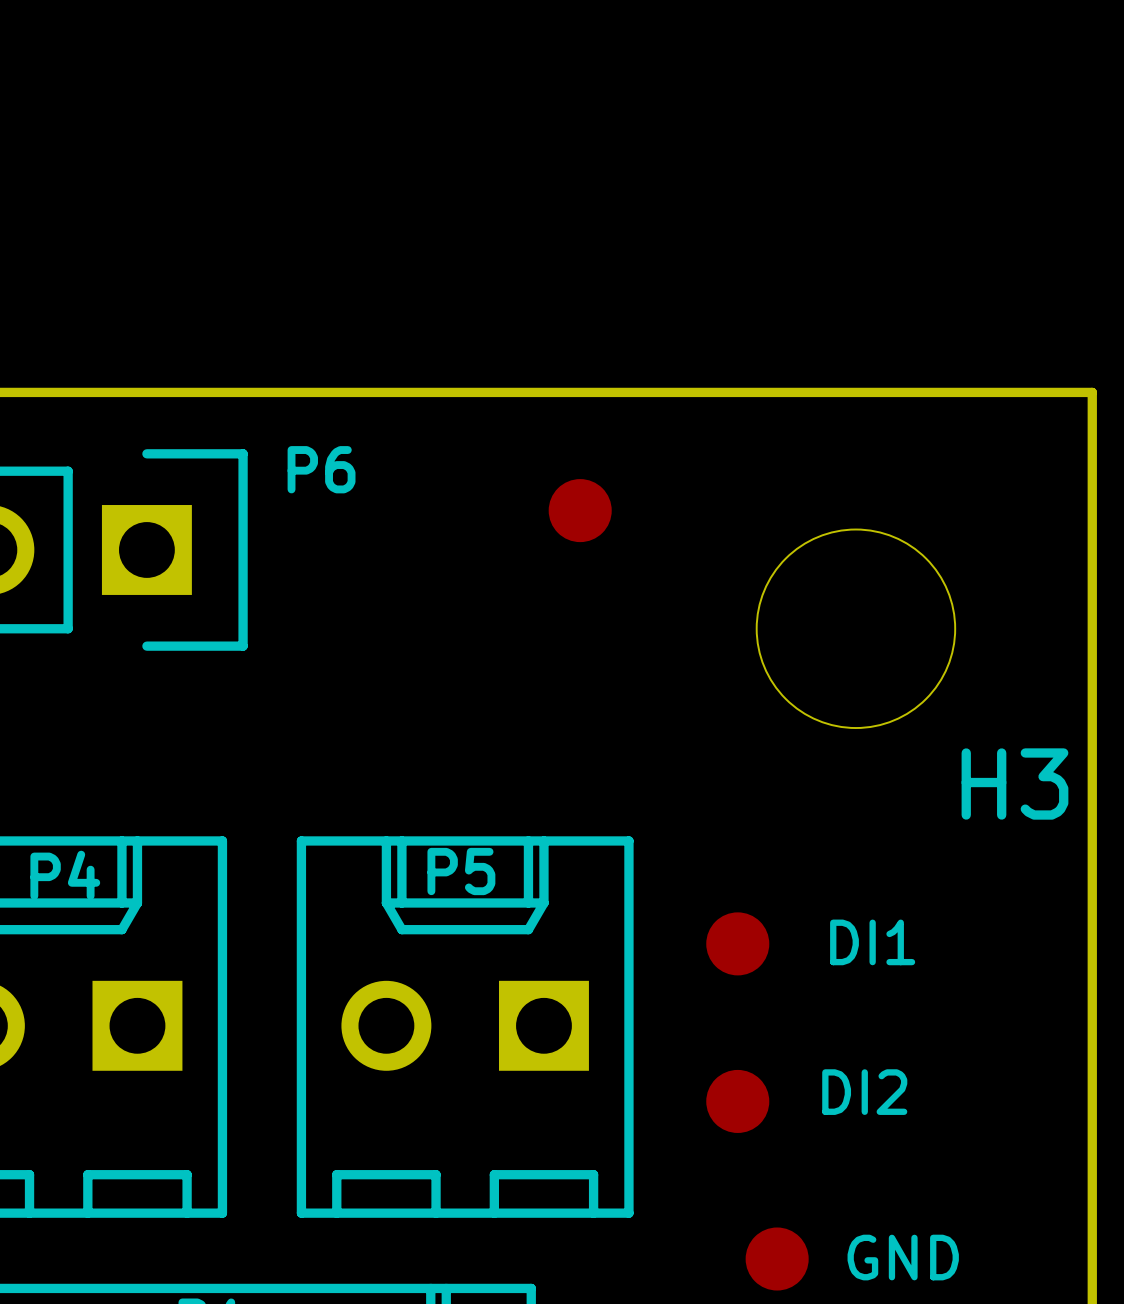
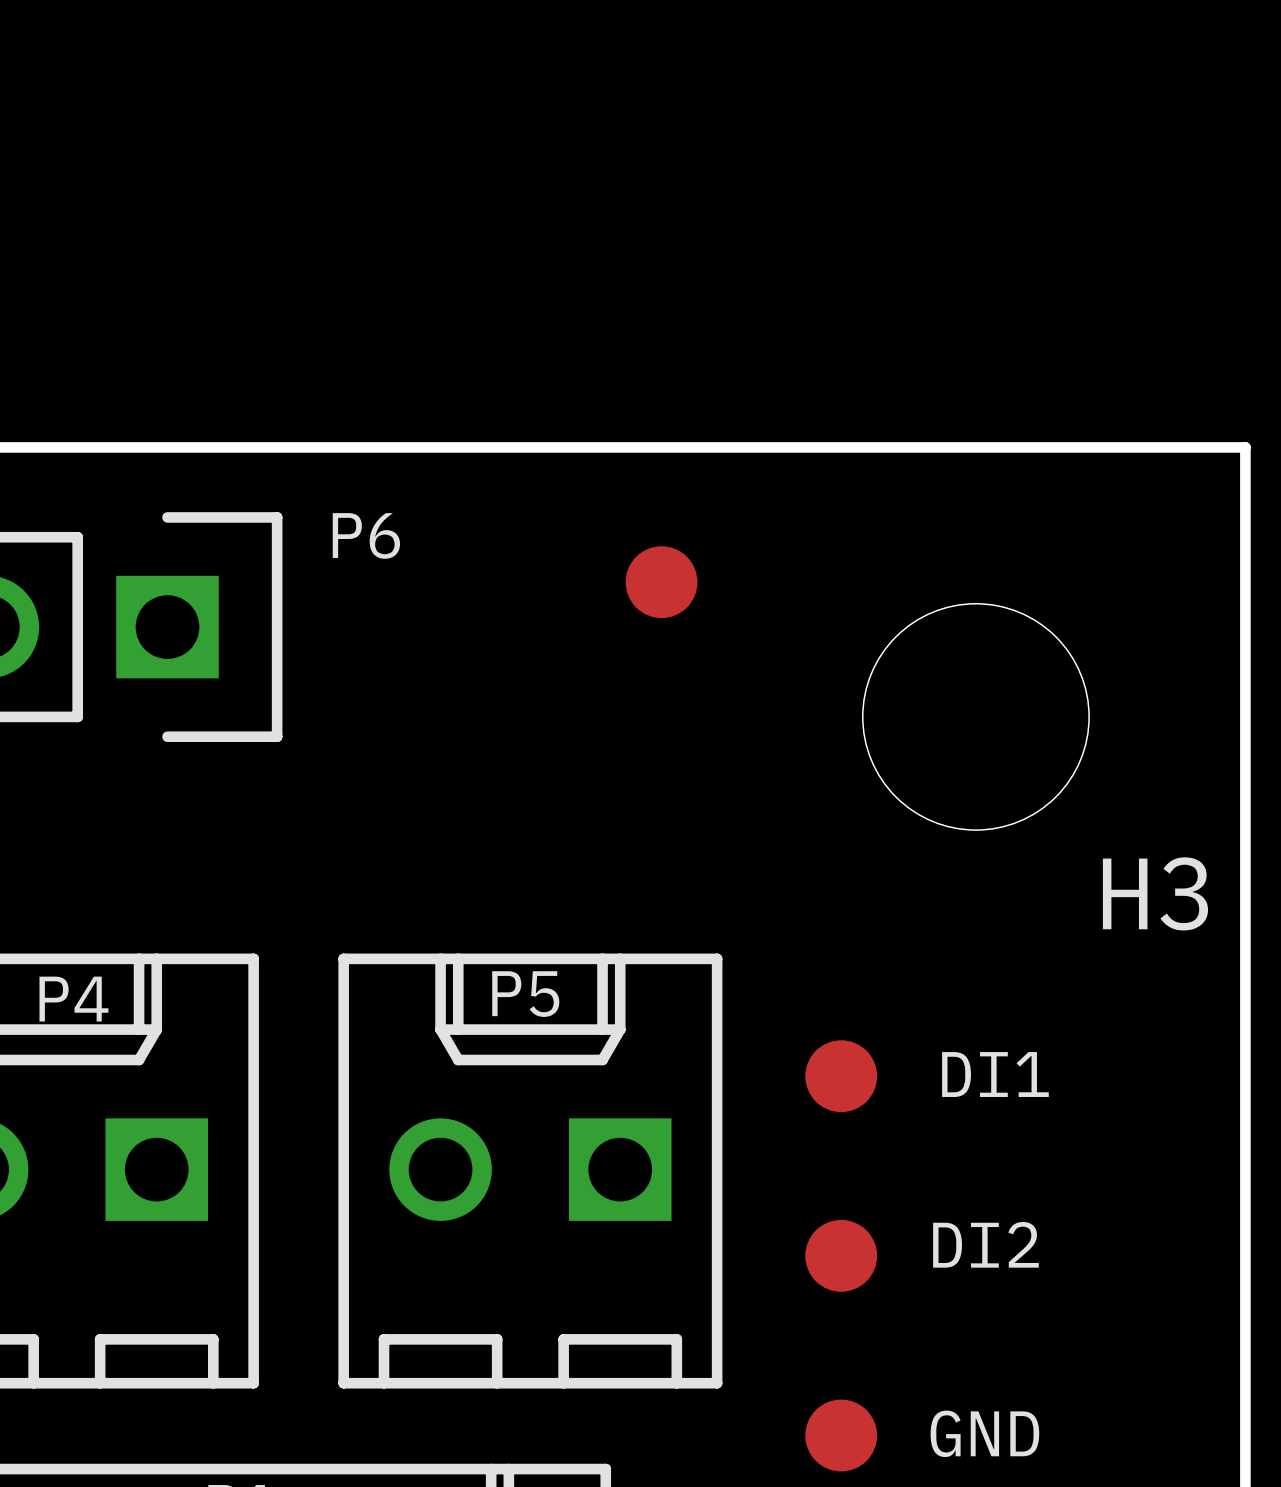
part position: (777, 1259) -> (841, 1435)

